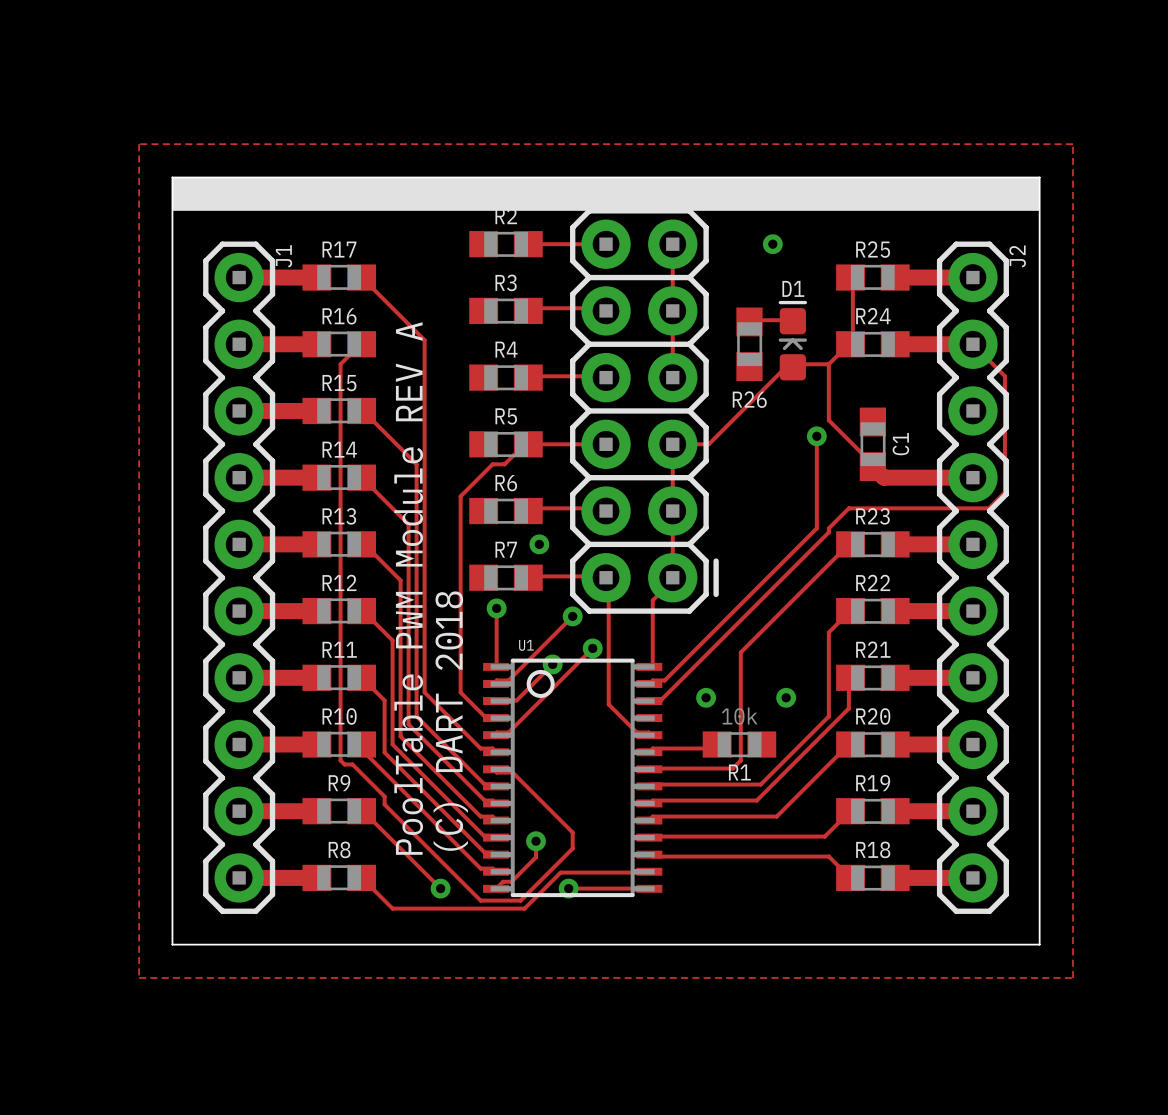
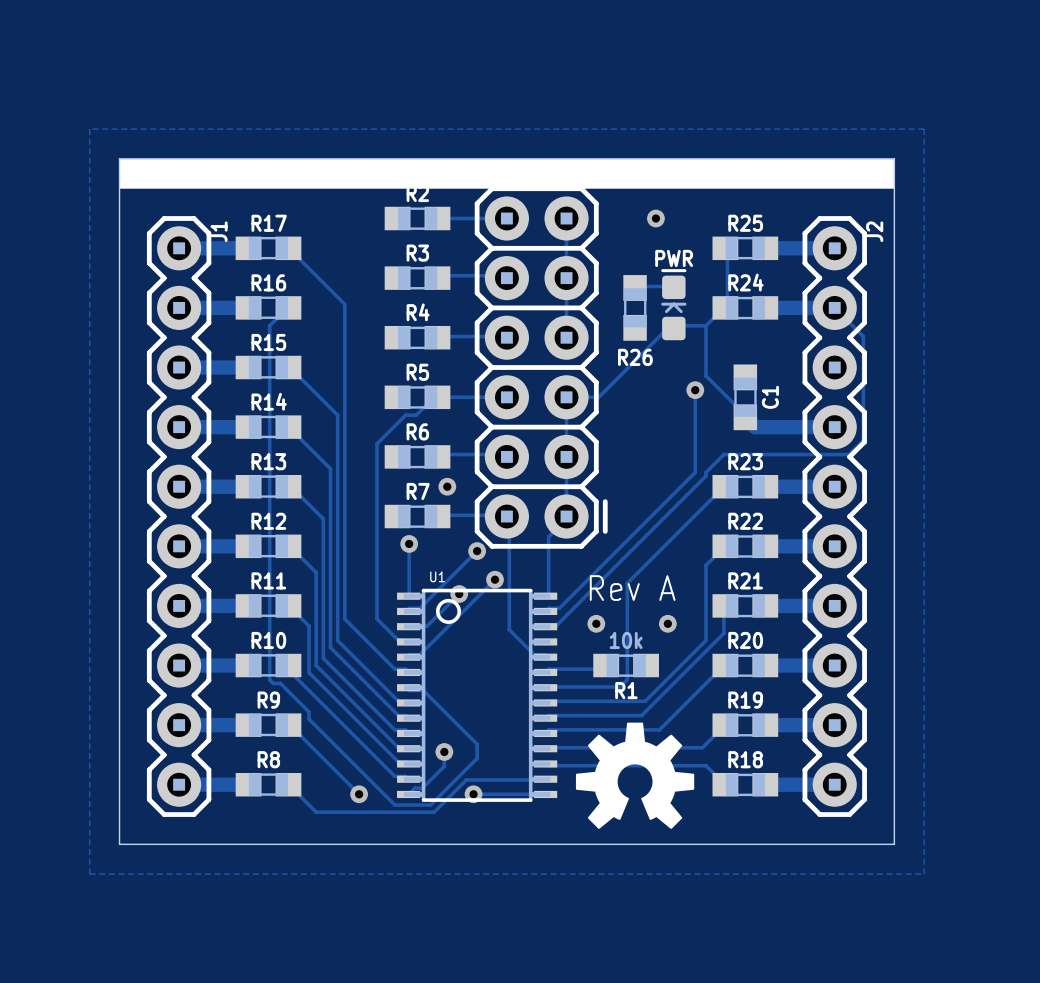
D1 name: D1 (793, 288) -> PWR (674, 258)
text: PoolTable PWM Module REV A (408, 588) -> none
text: none -> Rev A (632, 588)
text: (C) DART 2018 (450, 721) -> none
drawing: none -> [575, 722, 695, 829]

